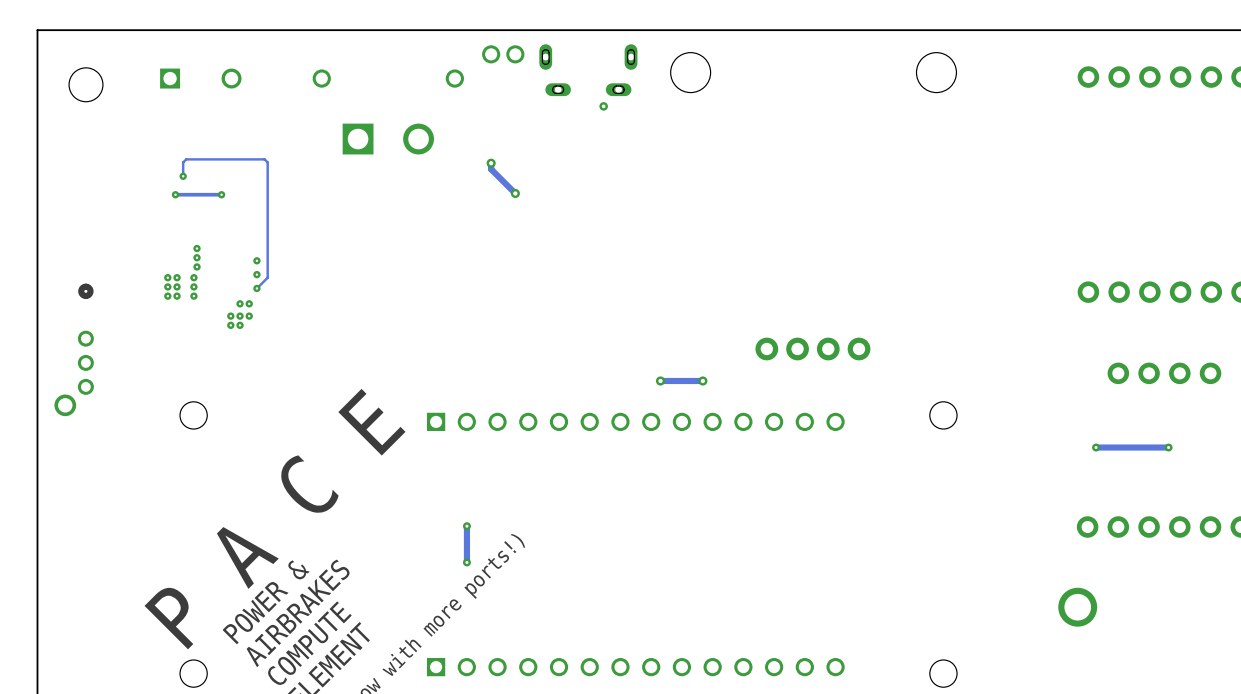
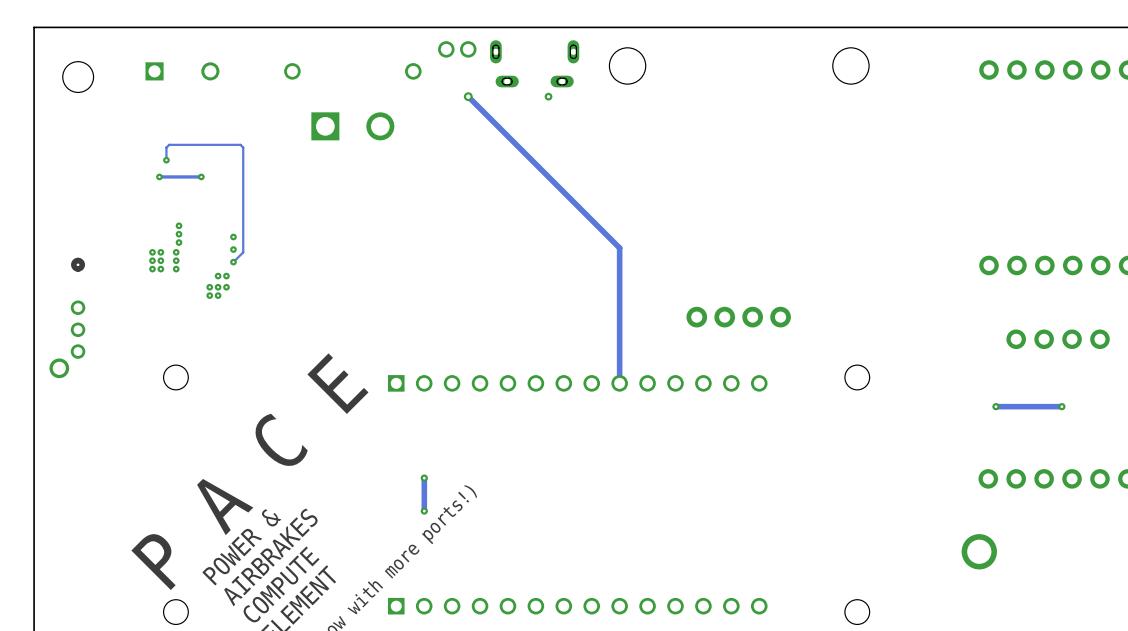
track: none -> (468, 96) (619, 248) (619, 383)
via: none -> (468, 96)
track: (491, 163) (491, 169) (515, 193) -> none
via: (491, 163) -> none
via: (515, 193) -> none
via: (660, 380) -> none
track: (702, 380) (660, 380) -> none
via: (702, 380) -> none

